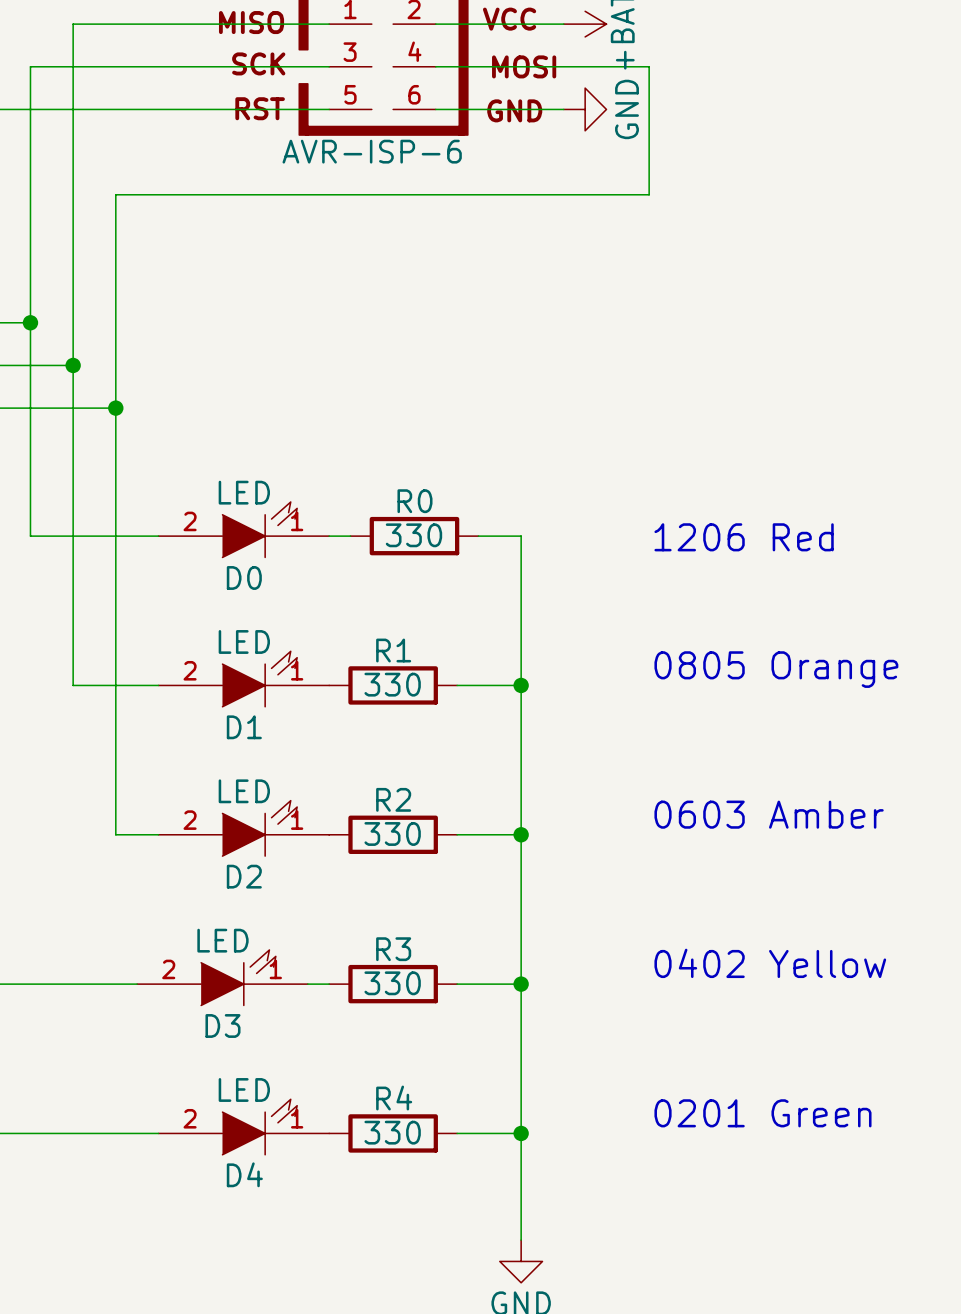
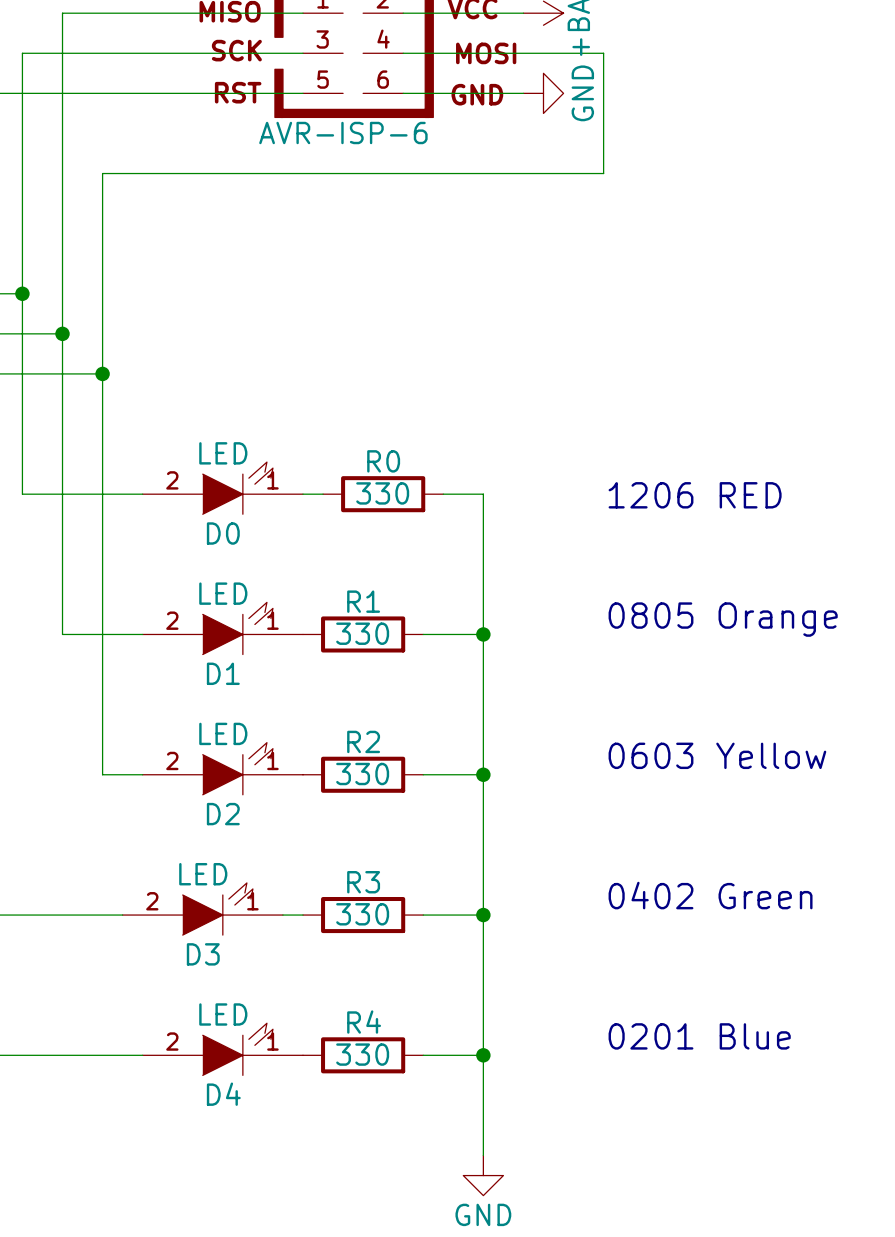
text: 1206 Red (744, 537) -> 1206 RED (695, 495)
text: 0603 Amber (769, 814) -> 0603 Yellow (717, 755)
text: 0402 Yellow (770, 963) -> 0402 Green (710, 895)
text: 0201 Green (762, 1113) -> 0201 Blue (699, 1036)

